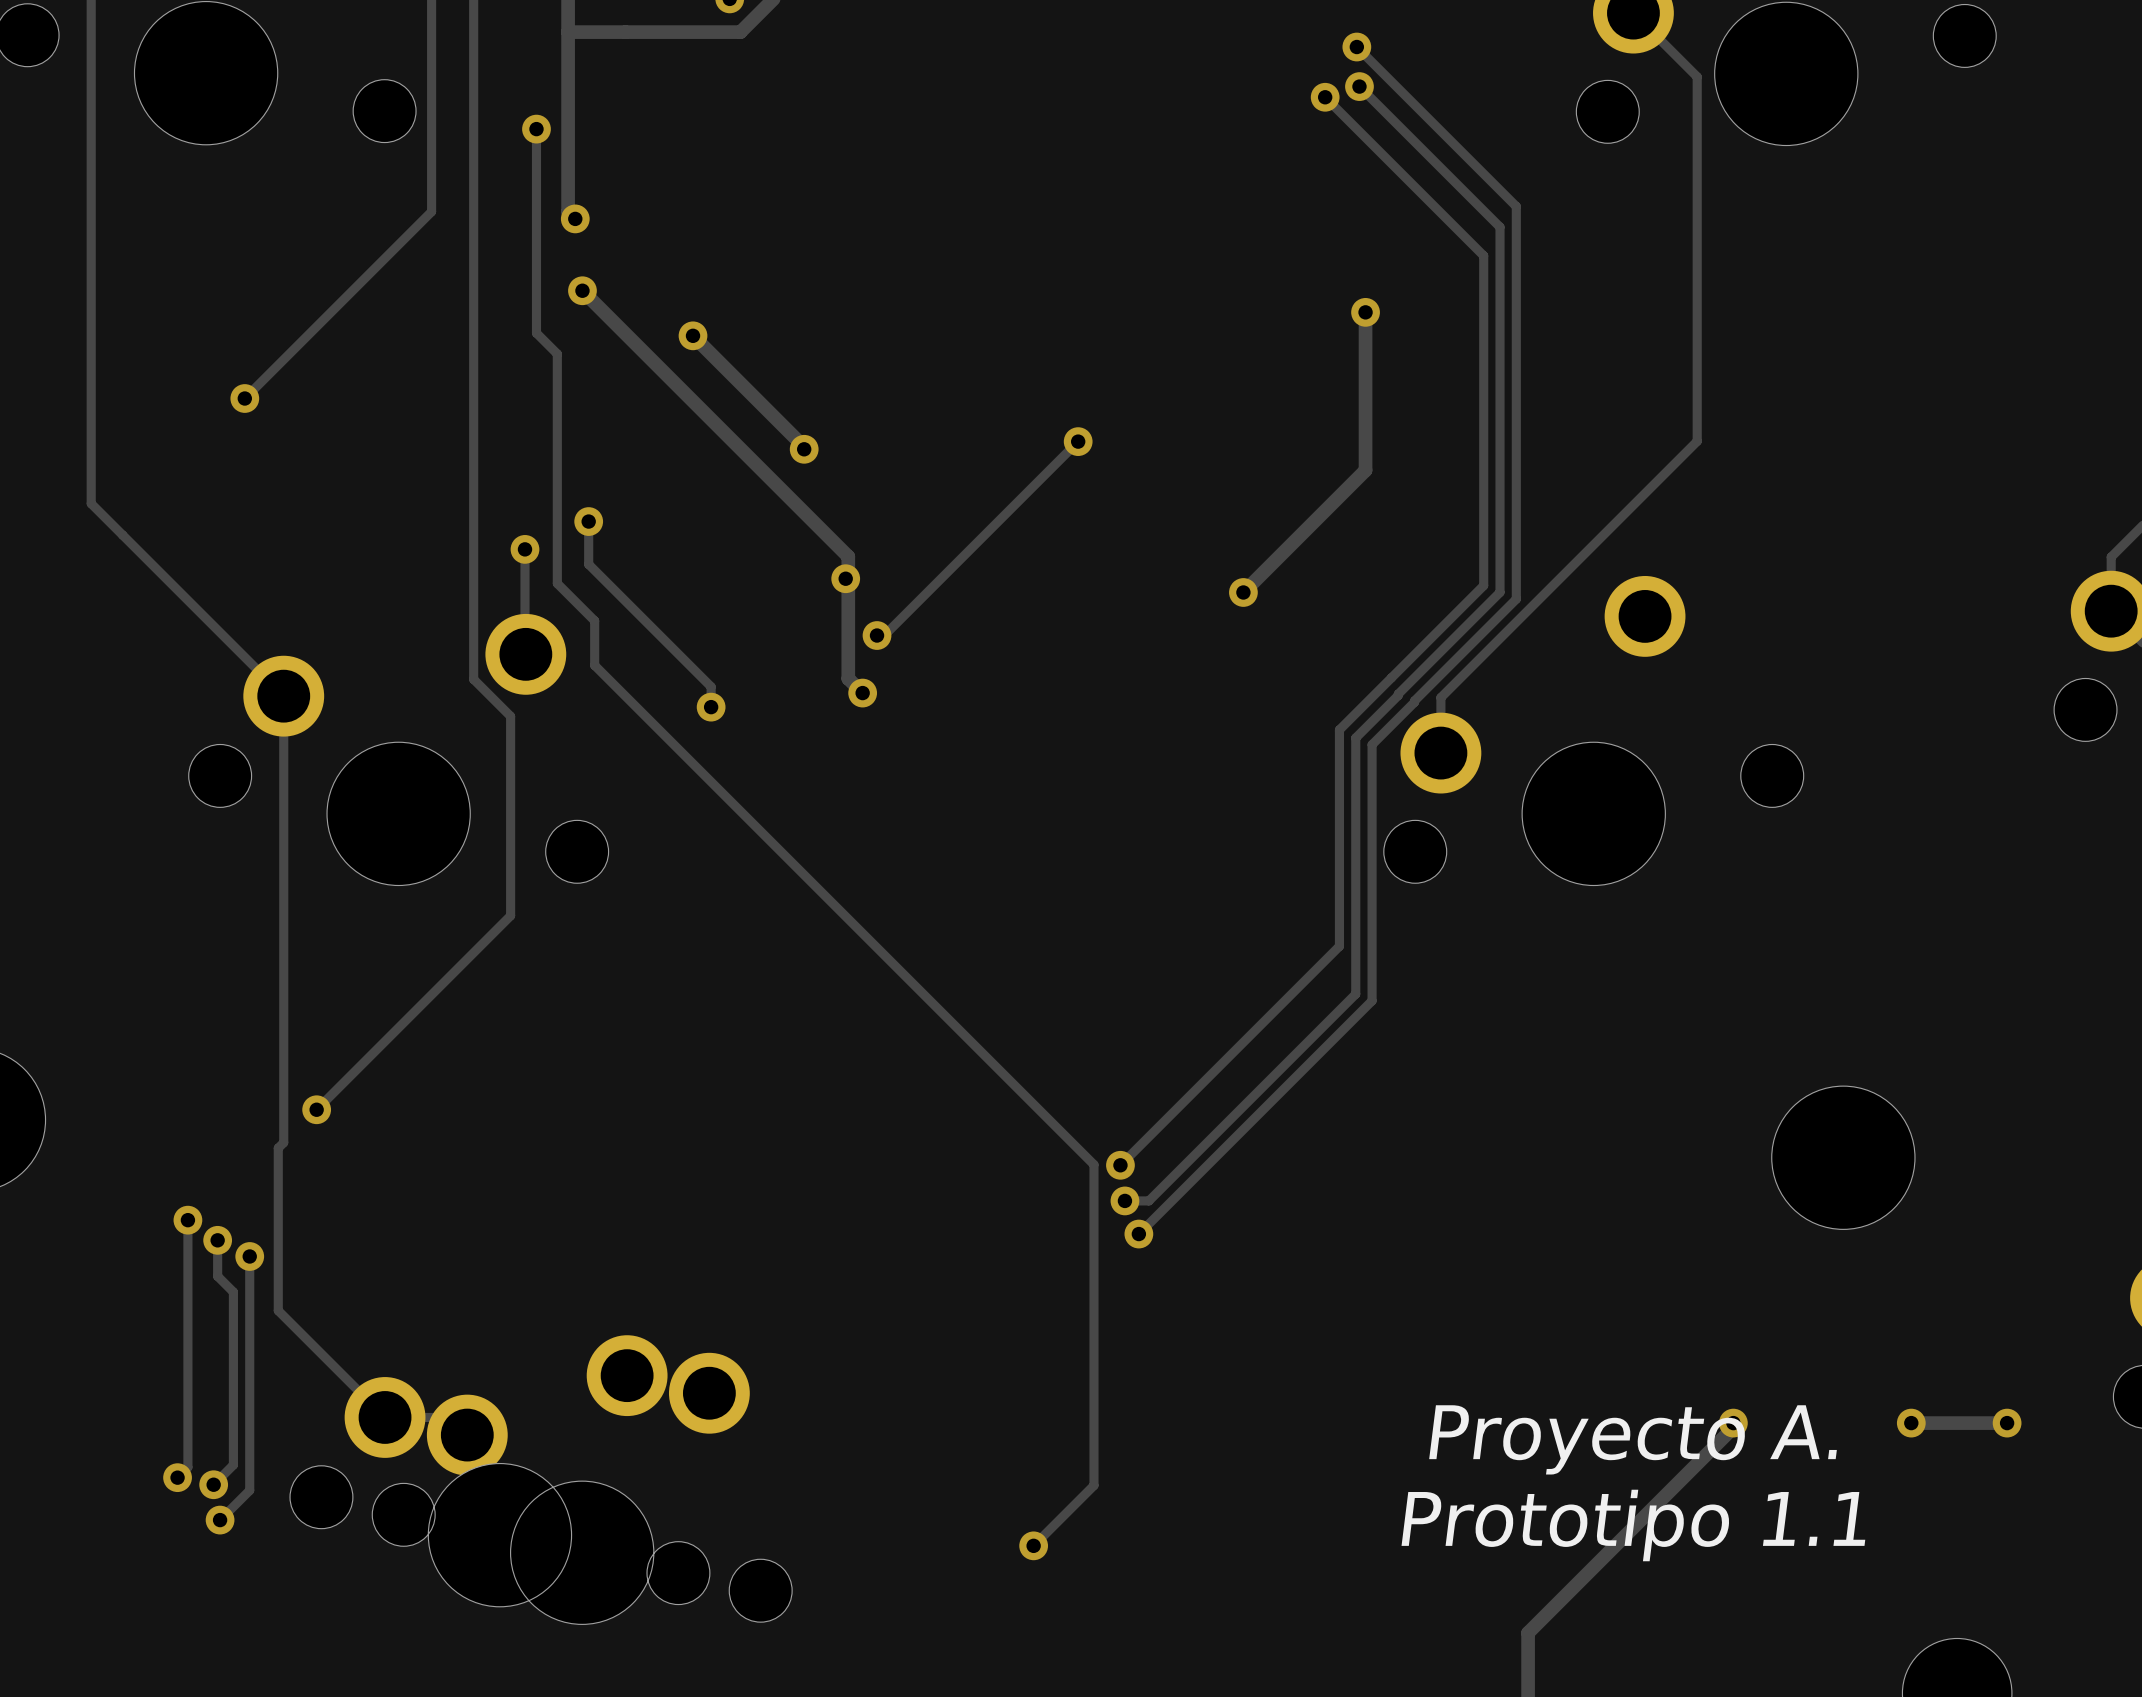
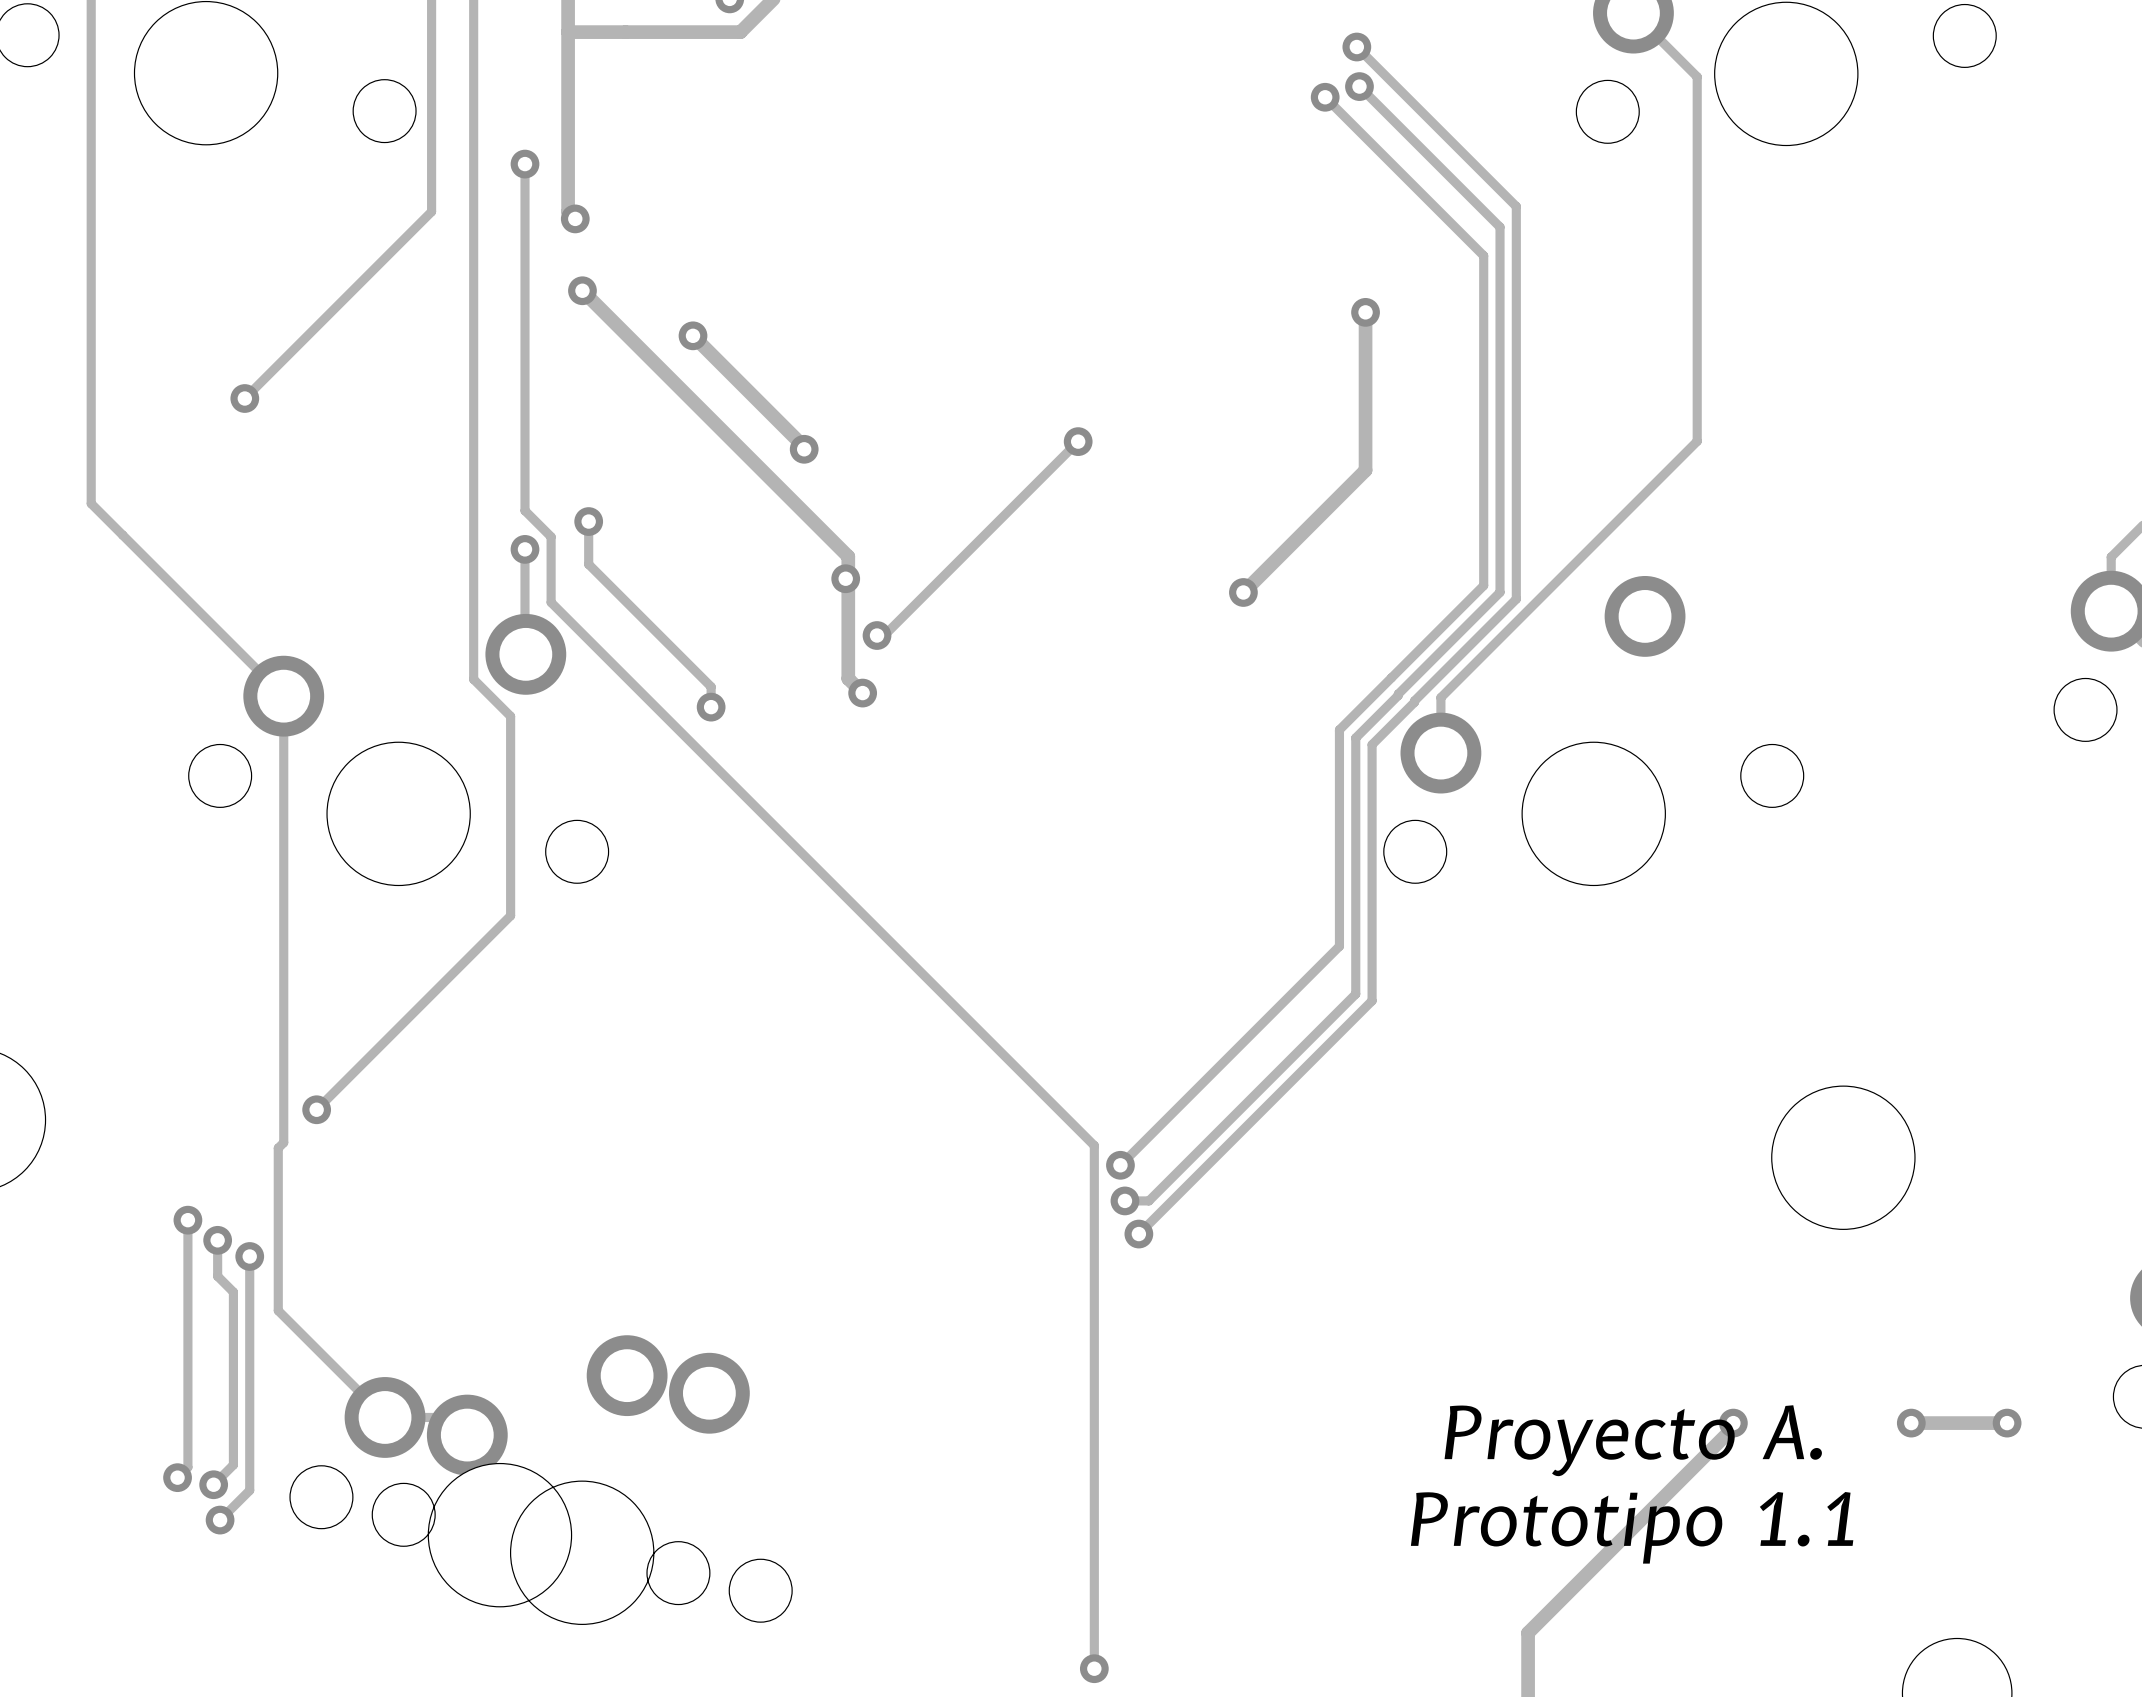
track: (536, 129) (536, 333) (557, 353) (557, 583) (594, 620) (594, 665) (1093, 1164) (1093, 1485) (1033, 1545) -> none
via position: (536, 129) -> (525, 164)
track: none -> (525, 164) (525, 510) (551, 536) (551, 602) (1094, 1145) (1094, 1668)
via position: (1033, 1545) -> (1094, 1668)

